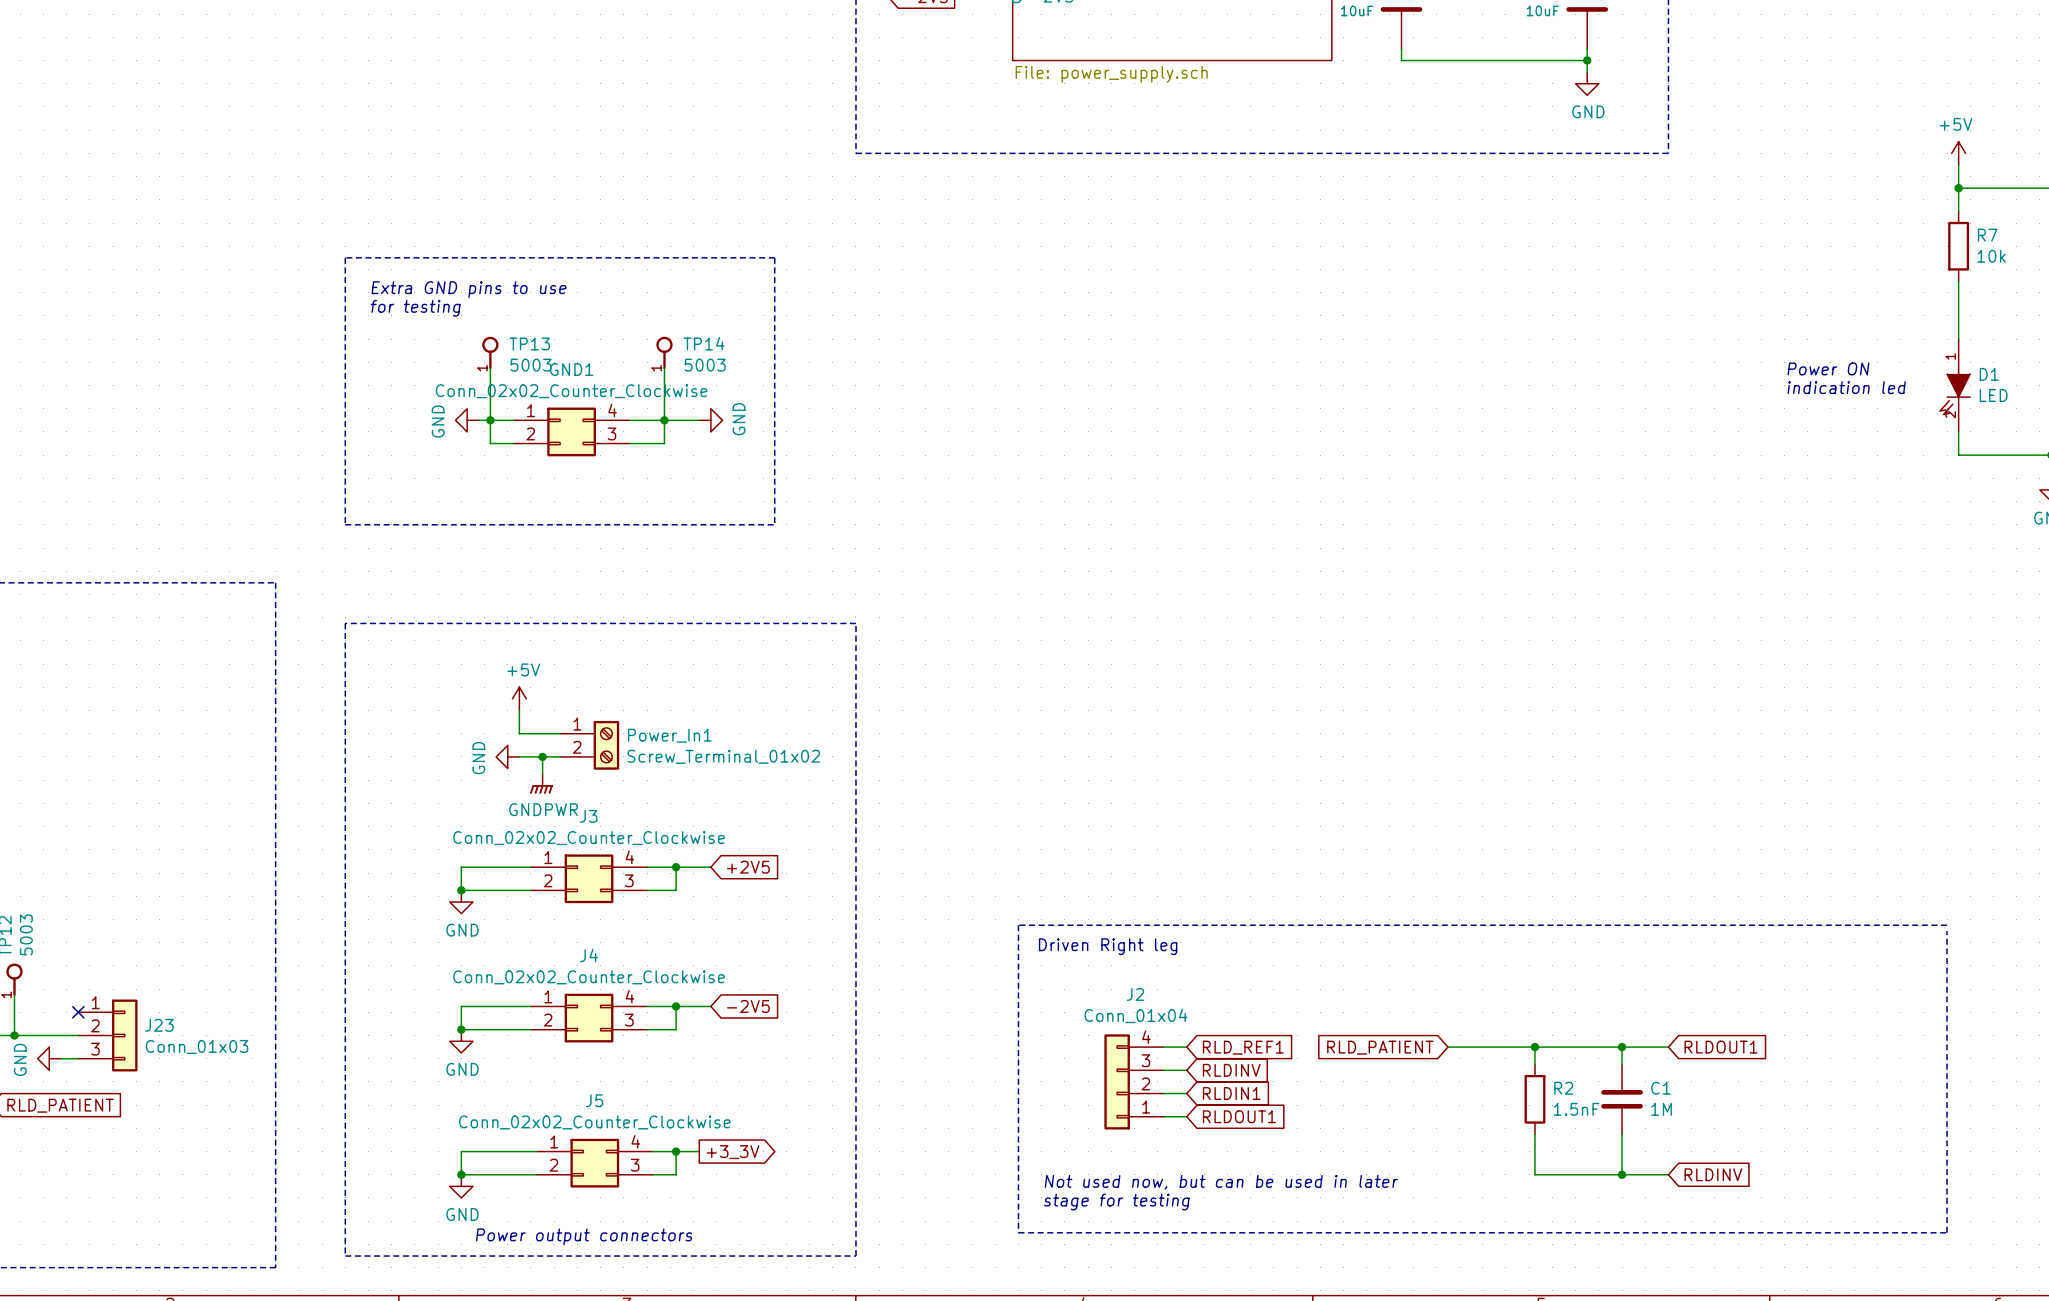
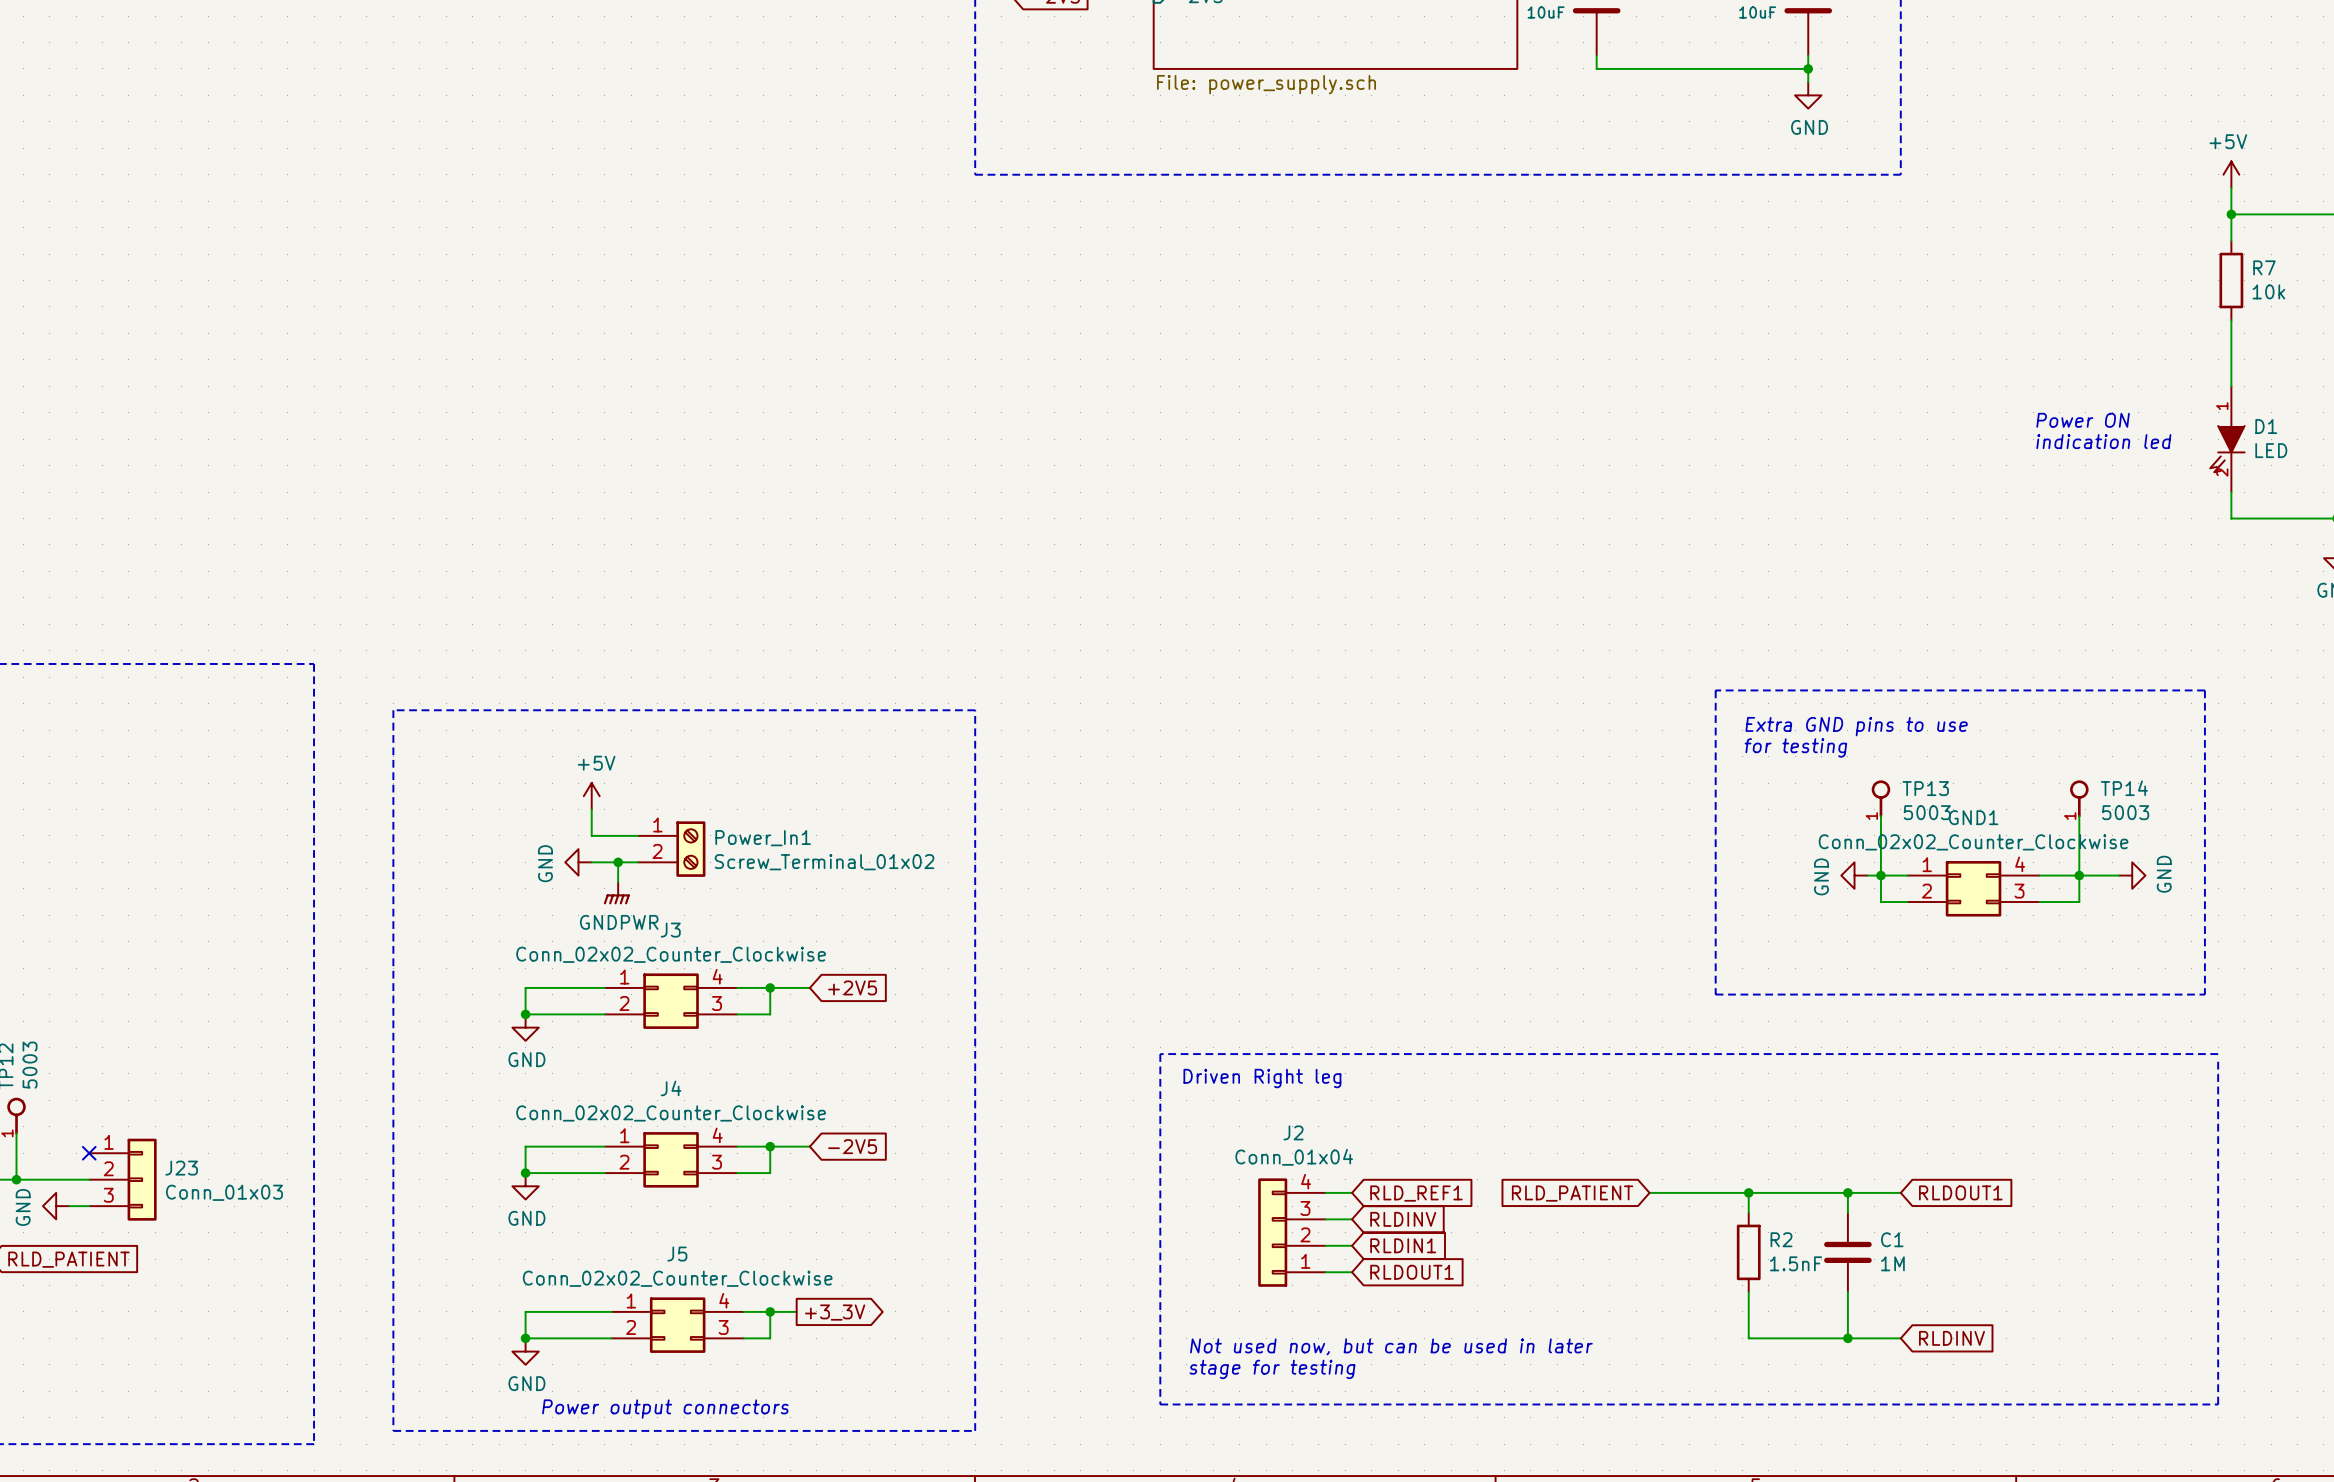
line: (345, 257) (345, 524) (774, 524) (774, 257) (345, 257) -> none
text: Extra GND pins to use (469, 289) -> none
text: for testing (415, 308) -> none
TP13 position: (490, 353) -> (1880, 798)
TP14 position: (664, 353) -> (2079, 798)
wire: (490, 368) (490, 443) (513, 443) -> none
wire: (664, 368) (664, 443) (629, 443) -> none
power symbol: GND (467, 420) -> none
wire: (478, 420) (513, 420) -> none
junction: (490, 420) -> none
wire: (629, 420) (699, 420) -> none
junction: (664, 420) -> none
power symbol: GND (710, 420) -> none
GND1 position: (571, 431) -> (1973, 888)
line: none -> (1715, 690) (2204, 690) (2204, 994) (1715, 994) (1715, 690)
text: none -> Extra GND pins to use (1856, 726)
text: none -> for testing (1795, 747)
wire: none -> (1880, 816) (1880, 902) (1907, 902)
wire: none -> (2079, 816) (2079, 902) (2039, 902)
power symbol: none -> GND (1854, 875)
wire: none -> (1867, 875) (1907, 875)
junction: none -> (1880, 875)
wire: none -> (2039, 875) (2118, 875)
junction: none -> (2079, 875)
power symbol: none -> GND (2132, 875)

